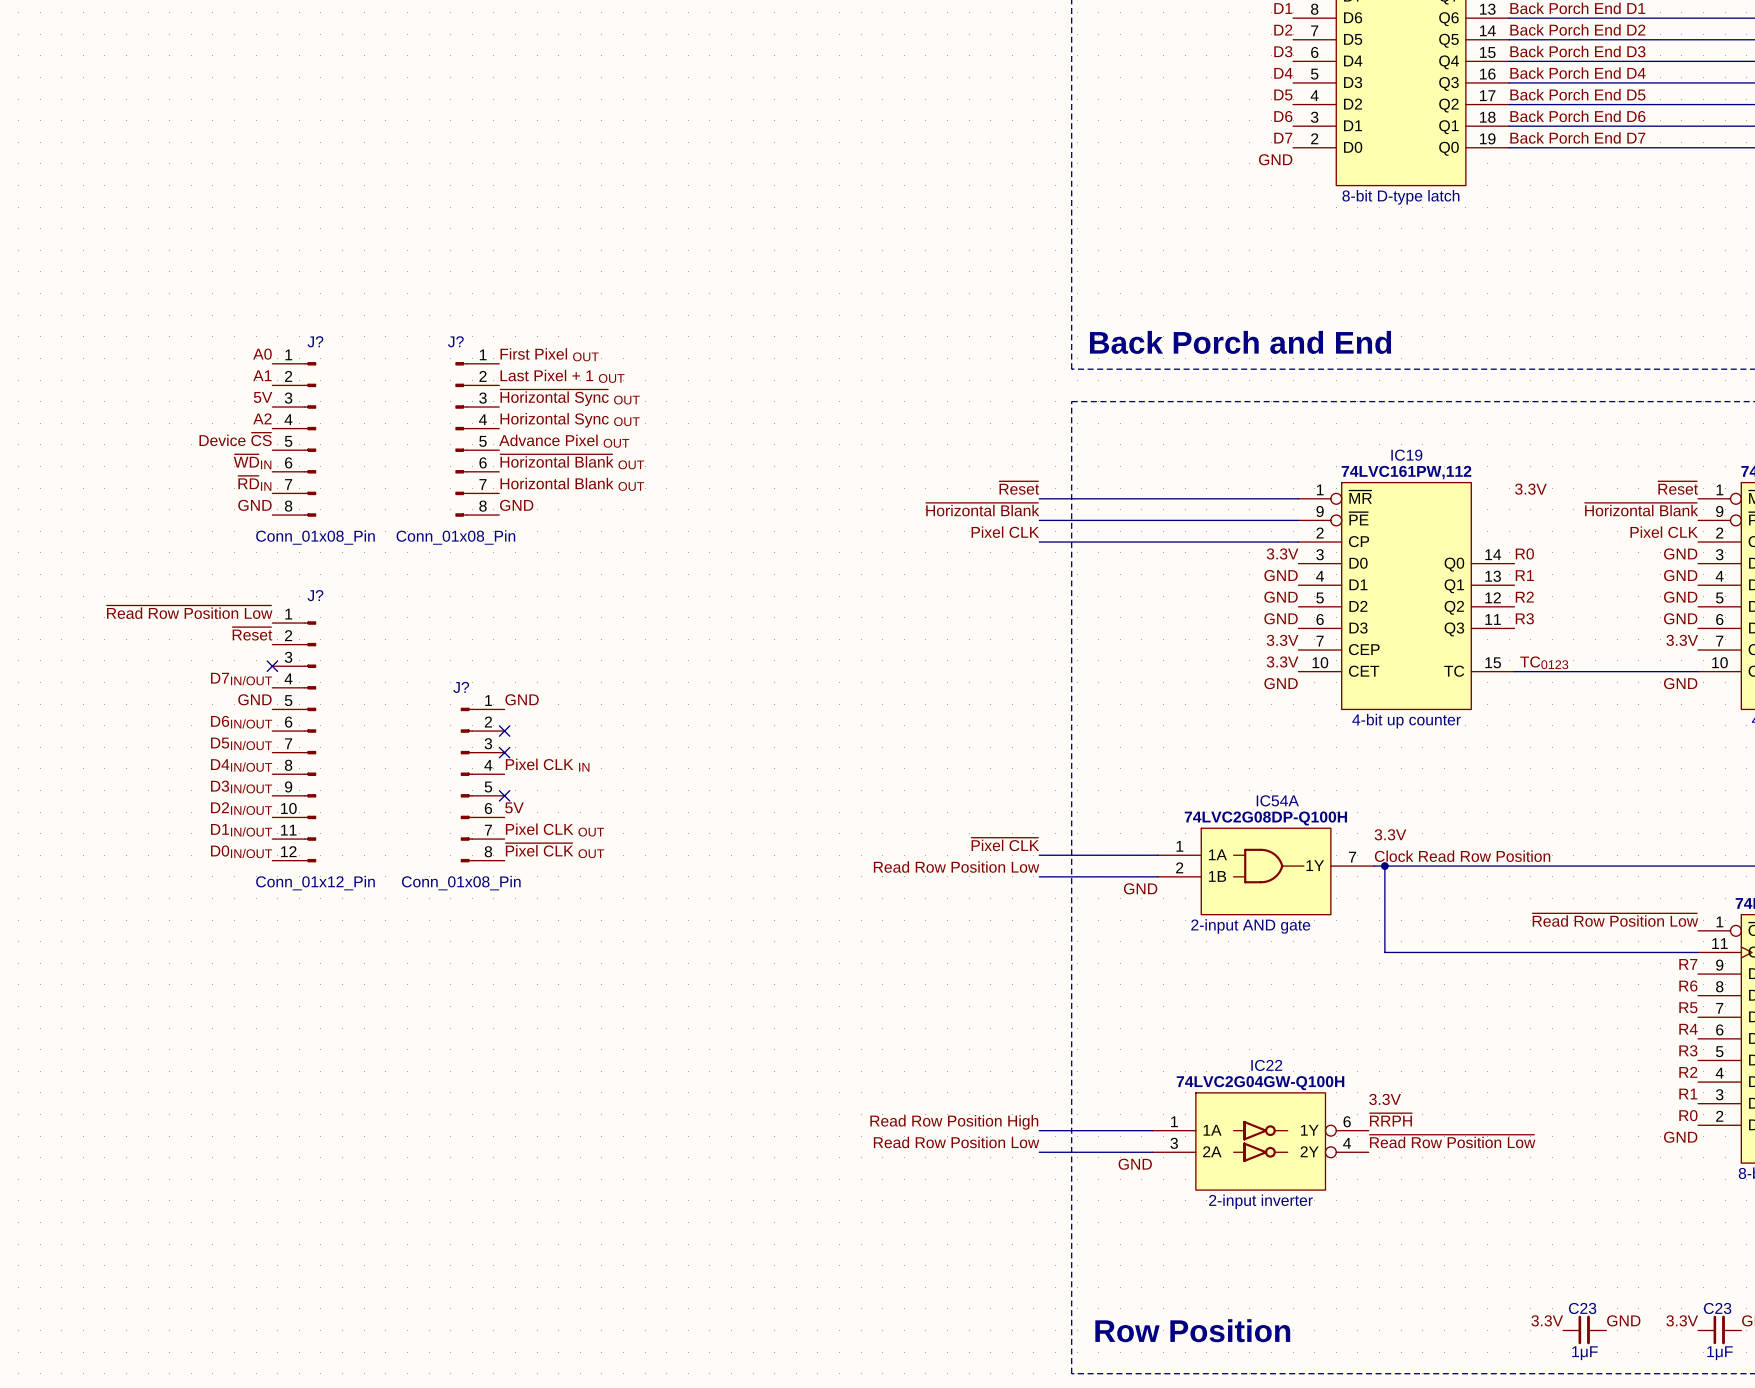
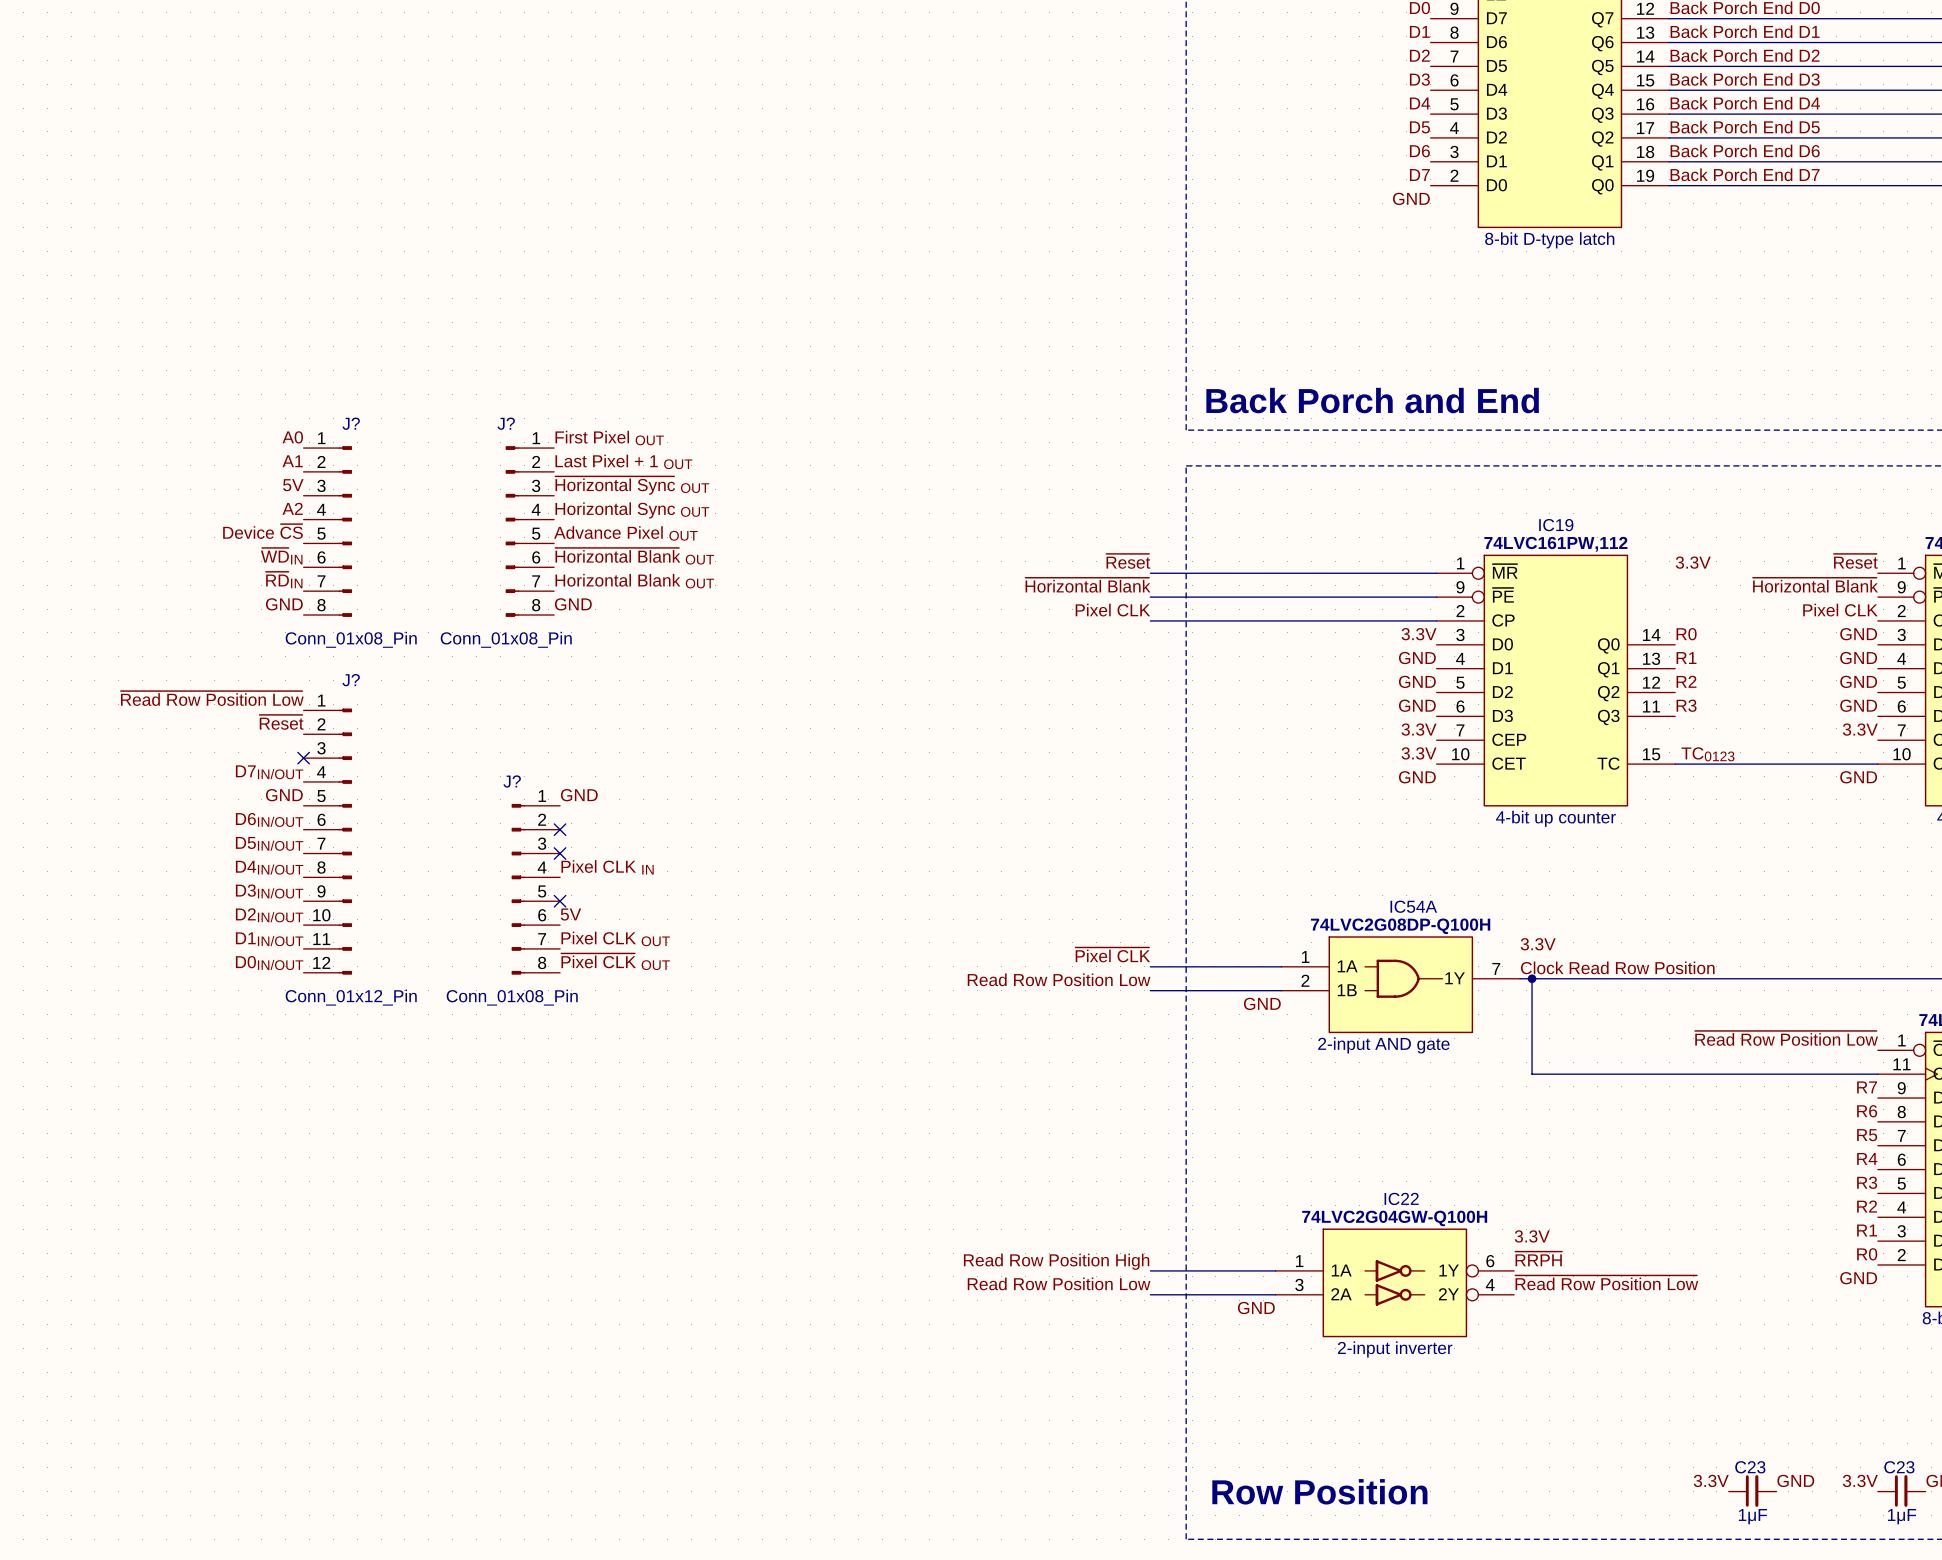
label: A0 (262, 354) -> none
label: First Pixel OUT (549, 354) -> none
label: A1 (262, 375) -> A0 (292, 437)
label: Last Pixel + 1 OUT (562, 376) -> First Pixel OUT (609, 438)
label: 5V (263, 397) -> A1 (292, 461)
label: ~{Horizontal Sync} OUT (570, 397) -> Last Pixel + 1 OUT (623, 461)
label: A2 (262, 418) -> 5V (293, 485)
label: Horizontal Sync OUT (570, 420) -> ~{Horizontal Sync} OUT (632, 485)
label: Device ~{CS} (235, 439) -> A2 (292, 508)
J? position: (294, 439) -> (327, 531)
J? position: (477, 439) -> (529, 531)
label: Advance Pixel OUT (564, 441) -> Horizontal Sync OUT (632, 510)
label: ~{WD}IN (252, 461) -> Device ~{CS} (262, 531)
label: ~{Horizontal Blank} OUT (572, 461) -> Advance Pixel OUT (625, 533)
label: ~{RD}IN (254, 483) -> ~{WD}IN (281, 556)
label: Horizontal Blank OUT (572, 484) -> ~{Horizontal Blank} OUT (634, 556)
label: GND (254, 505) -> ~{RD}IN (284, 580)
label: GND (516, 505) -> Horizontal Blank OUT (634, 581)
label: none -> GND (284, 604)
label: none -> GND (573, 604)

